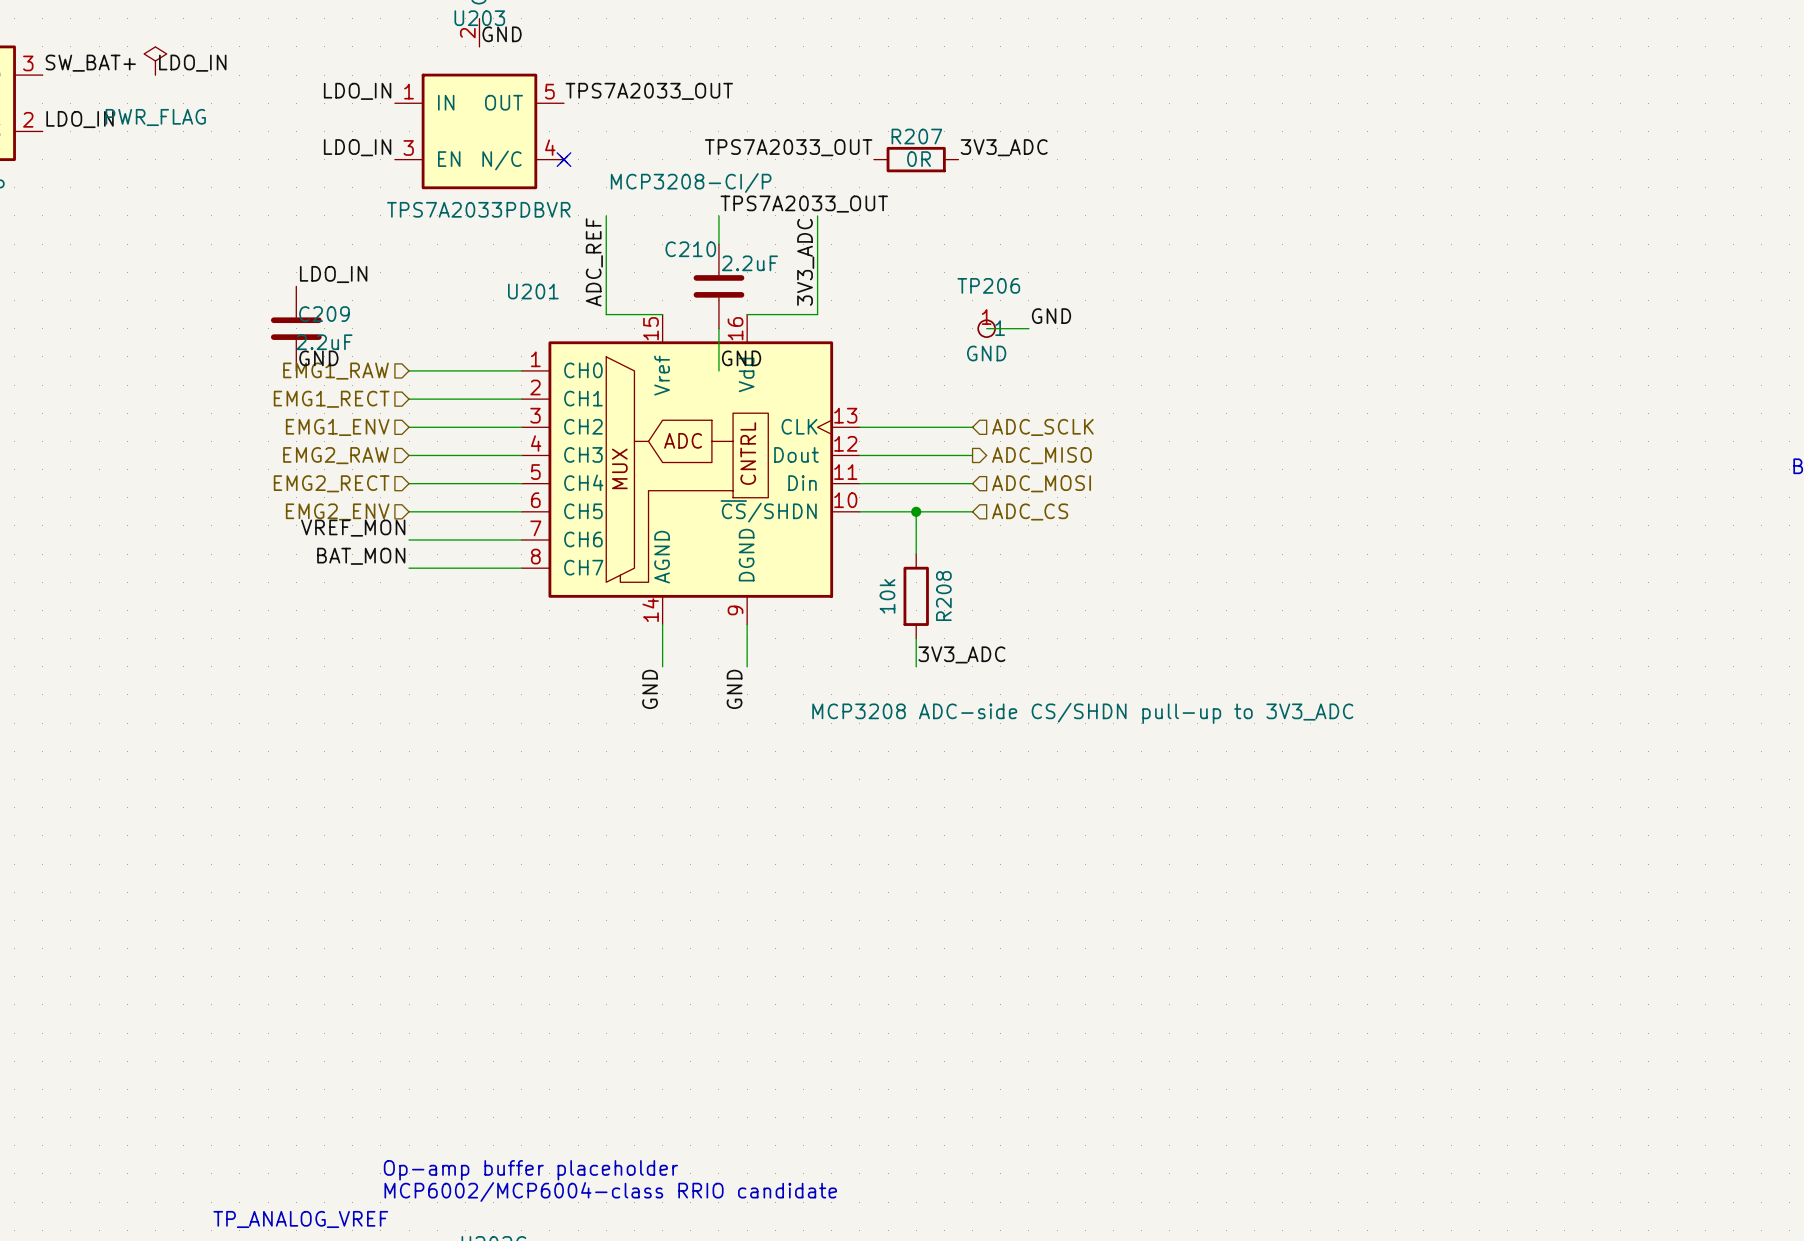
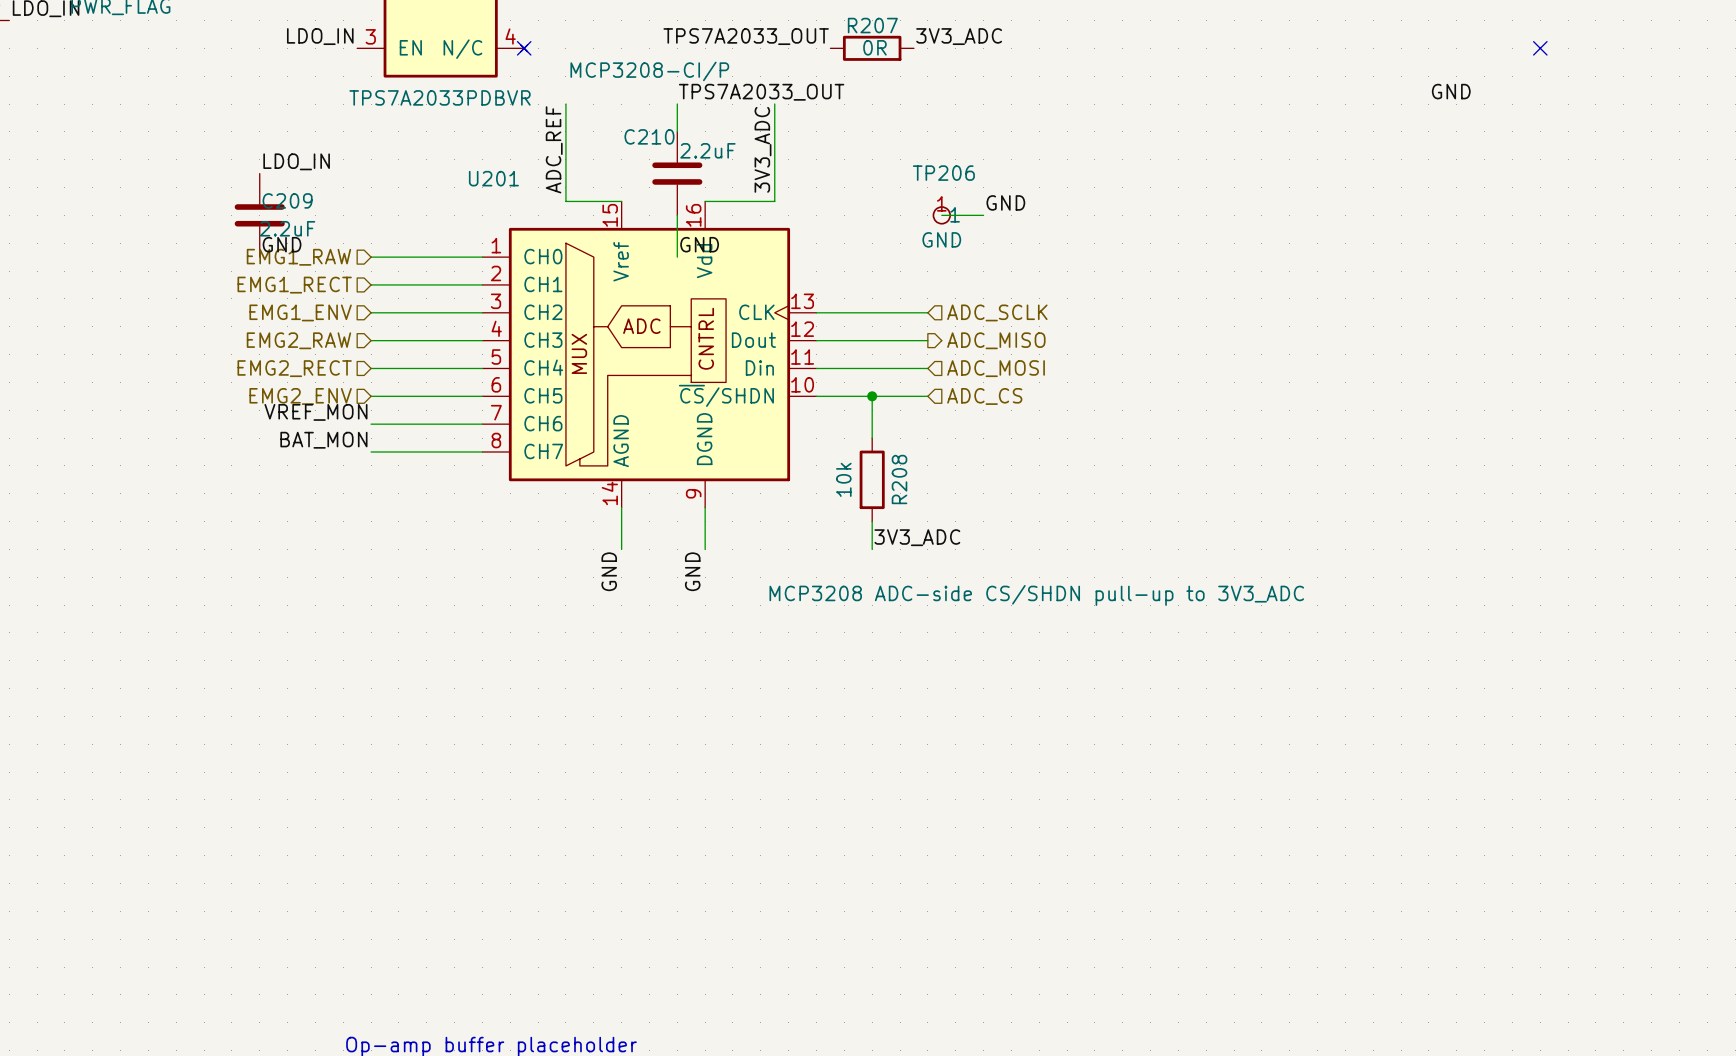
no-connect mark: none -> (1540, 48)
label: none -> GND (1451, 91)

